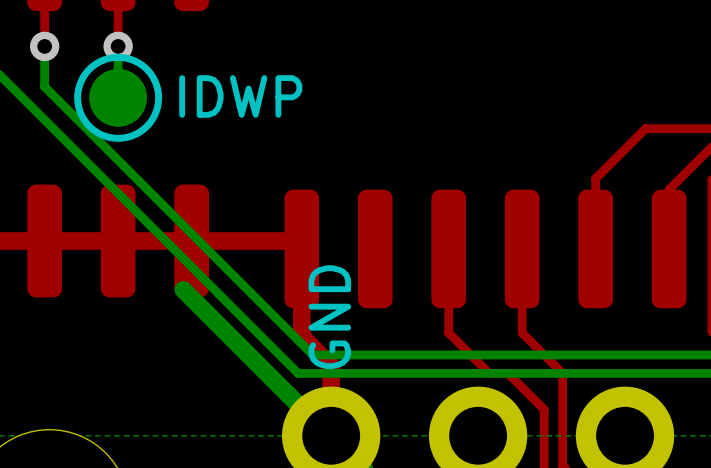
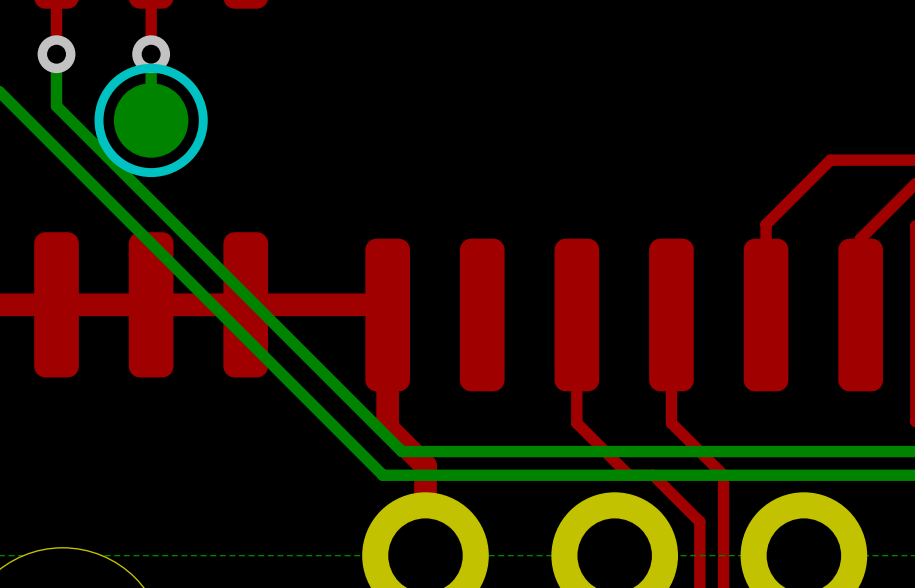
text: IDWP (240, 96) -> none
bottom track: (183, 289) (331, 435) -> none
text: GND (329, 317) -> none

